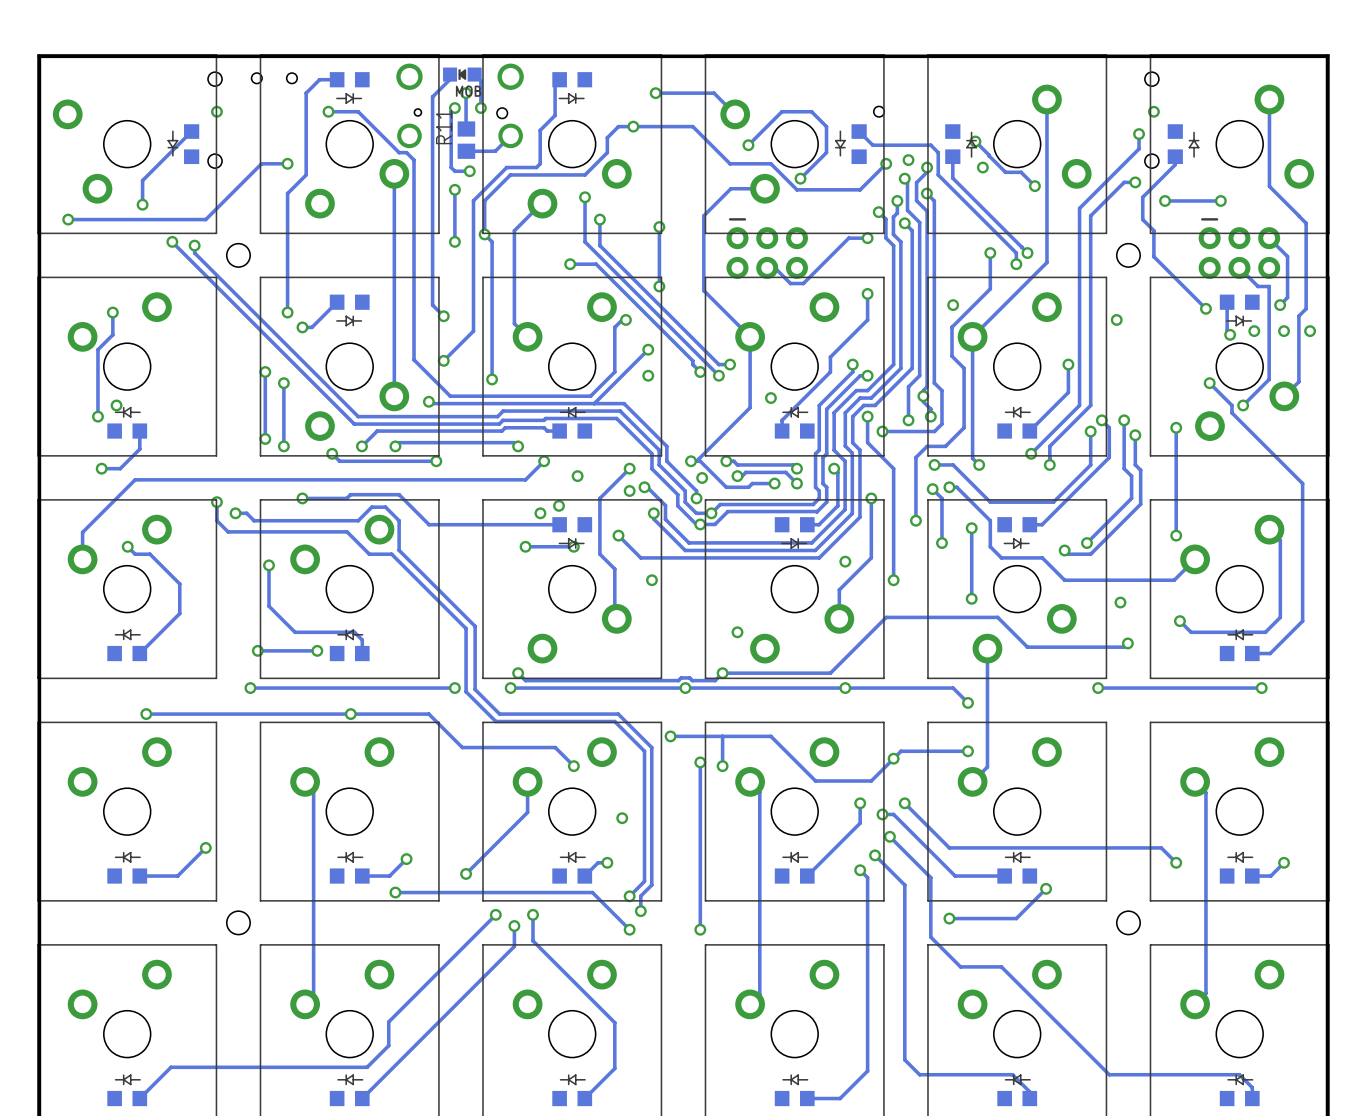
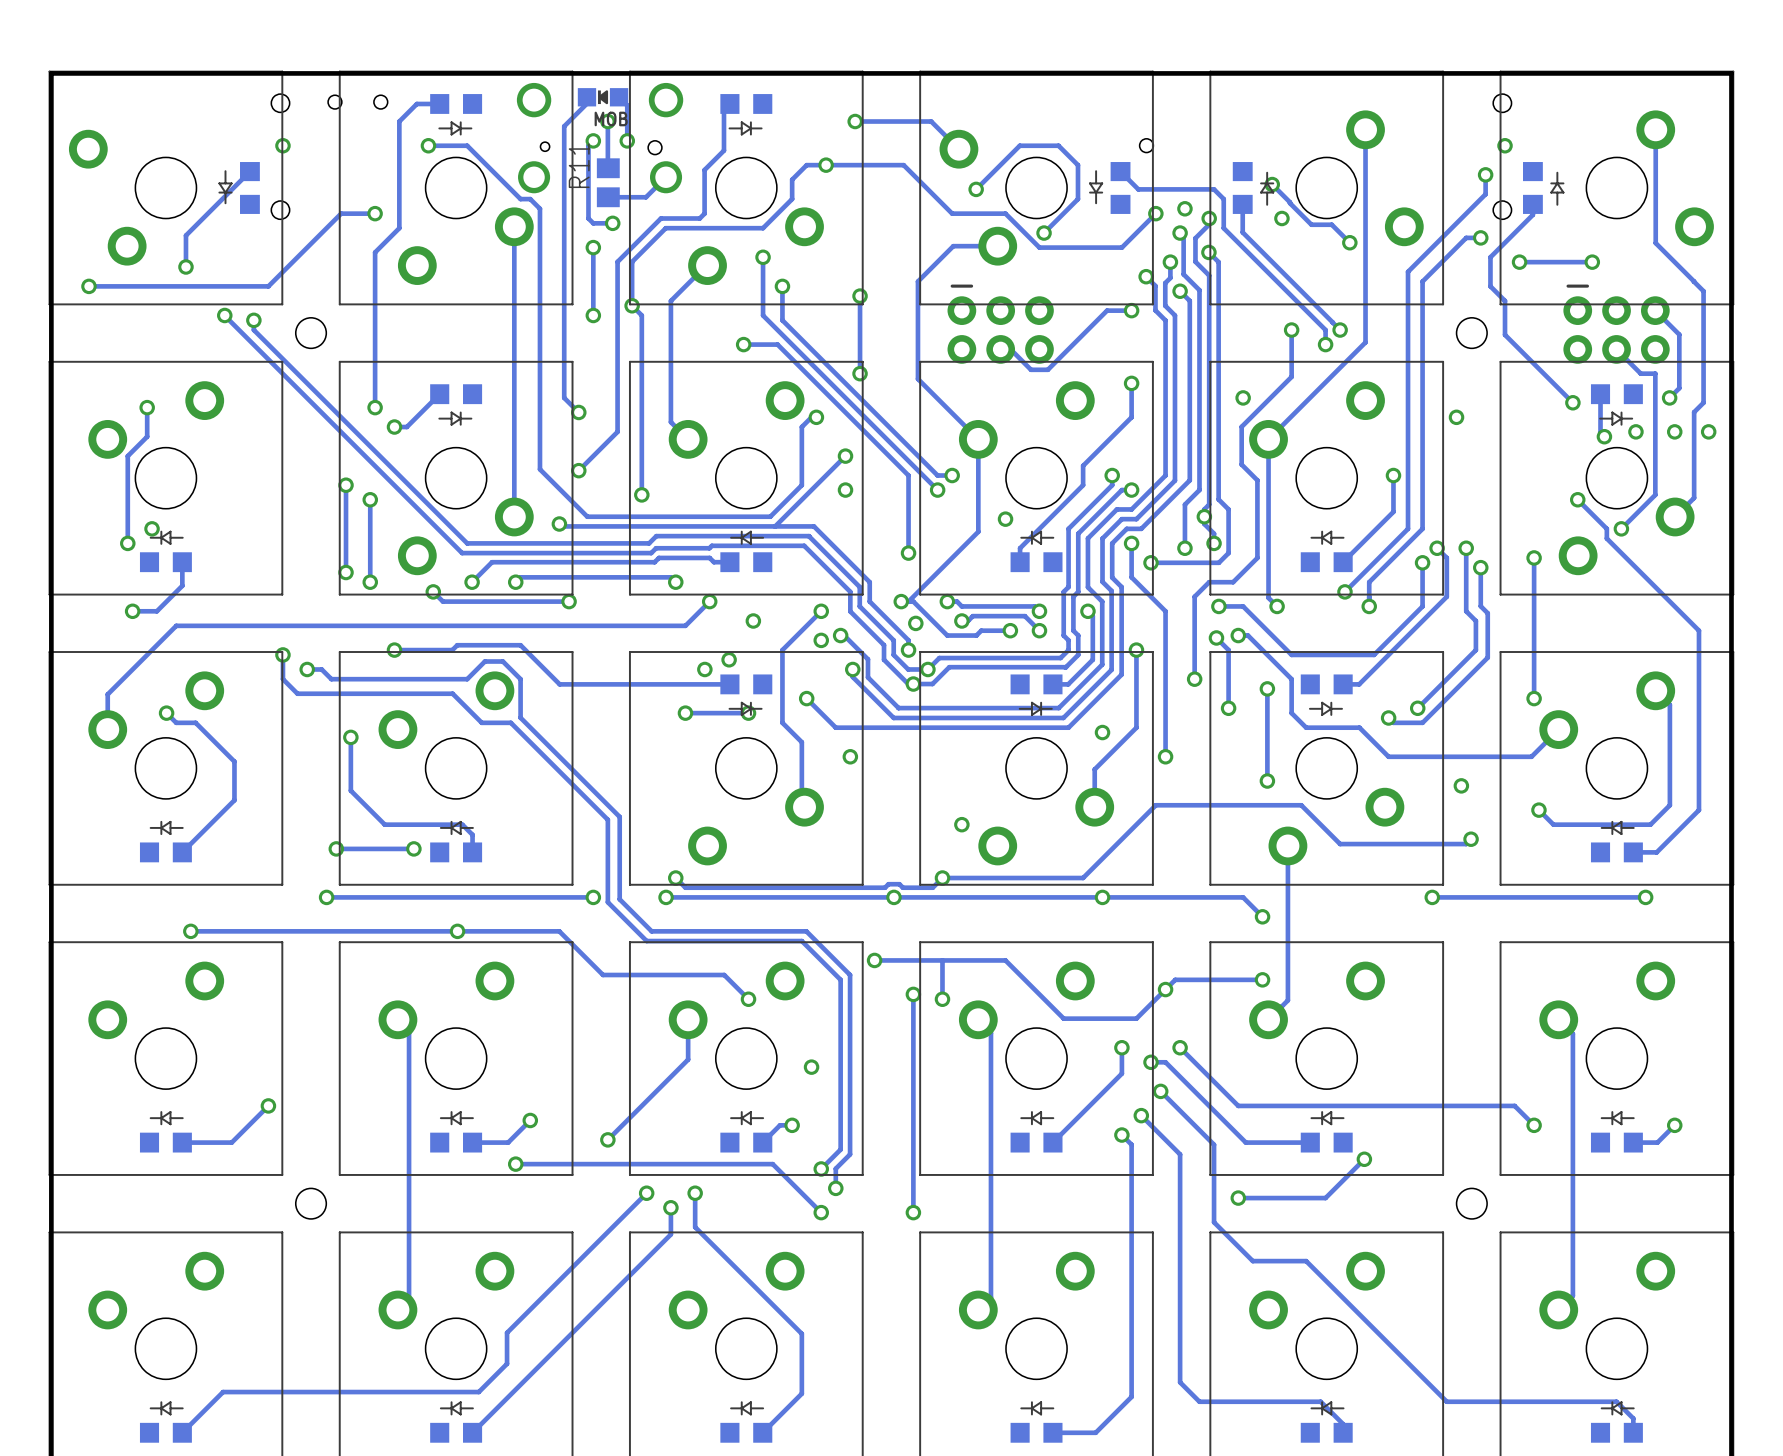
track: (692, 360) (692, 364) (700, 372) (700, 368) -> (903, 470) (908, 475) (908, 553)
via position: (700, 372) -> (908, 553)

